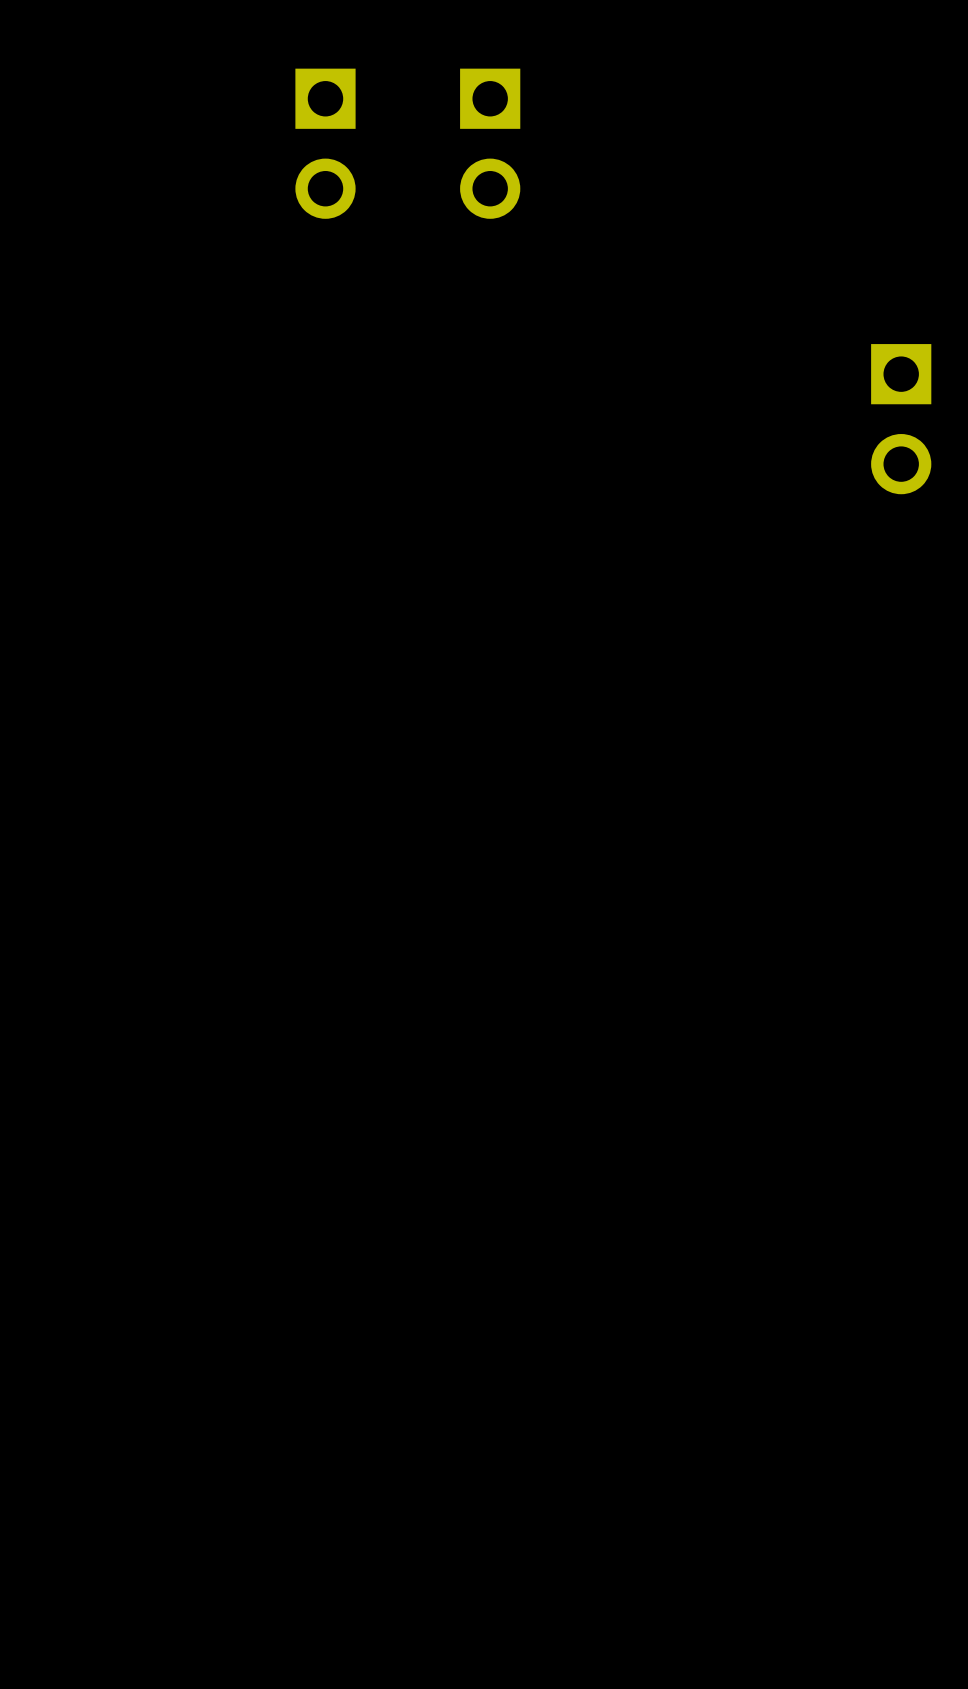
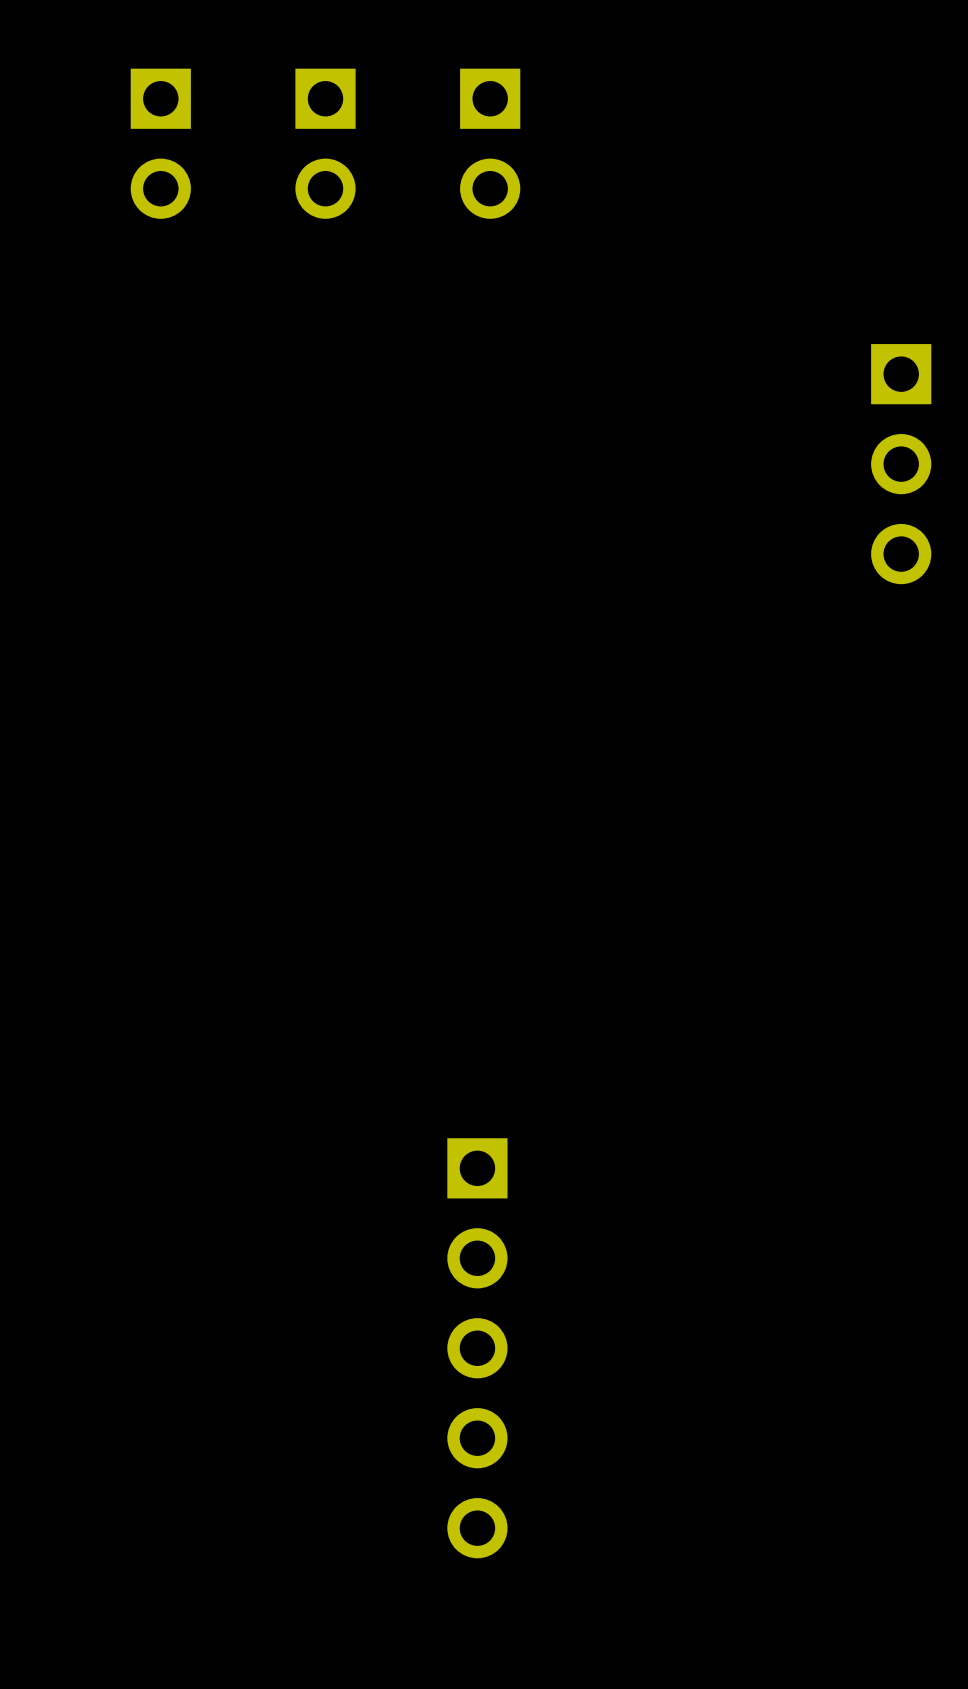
part position: (901, 419) -> (160, 143)
part: none -> (901, 464)
part: none -> (477, 1348)

